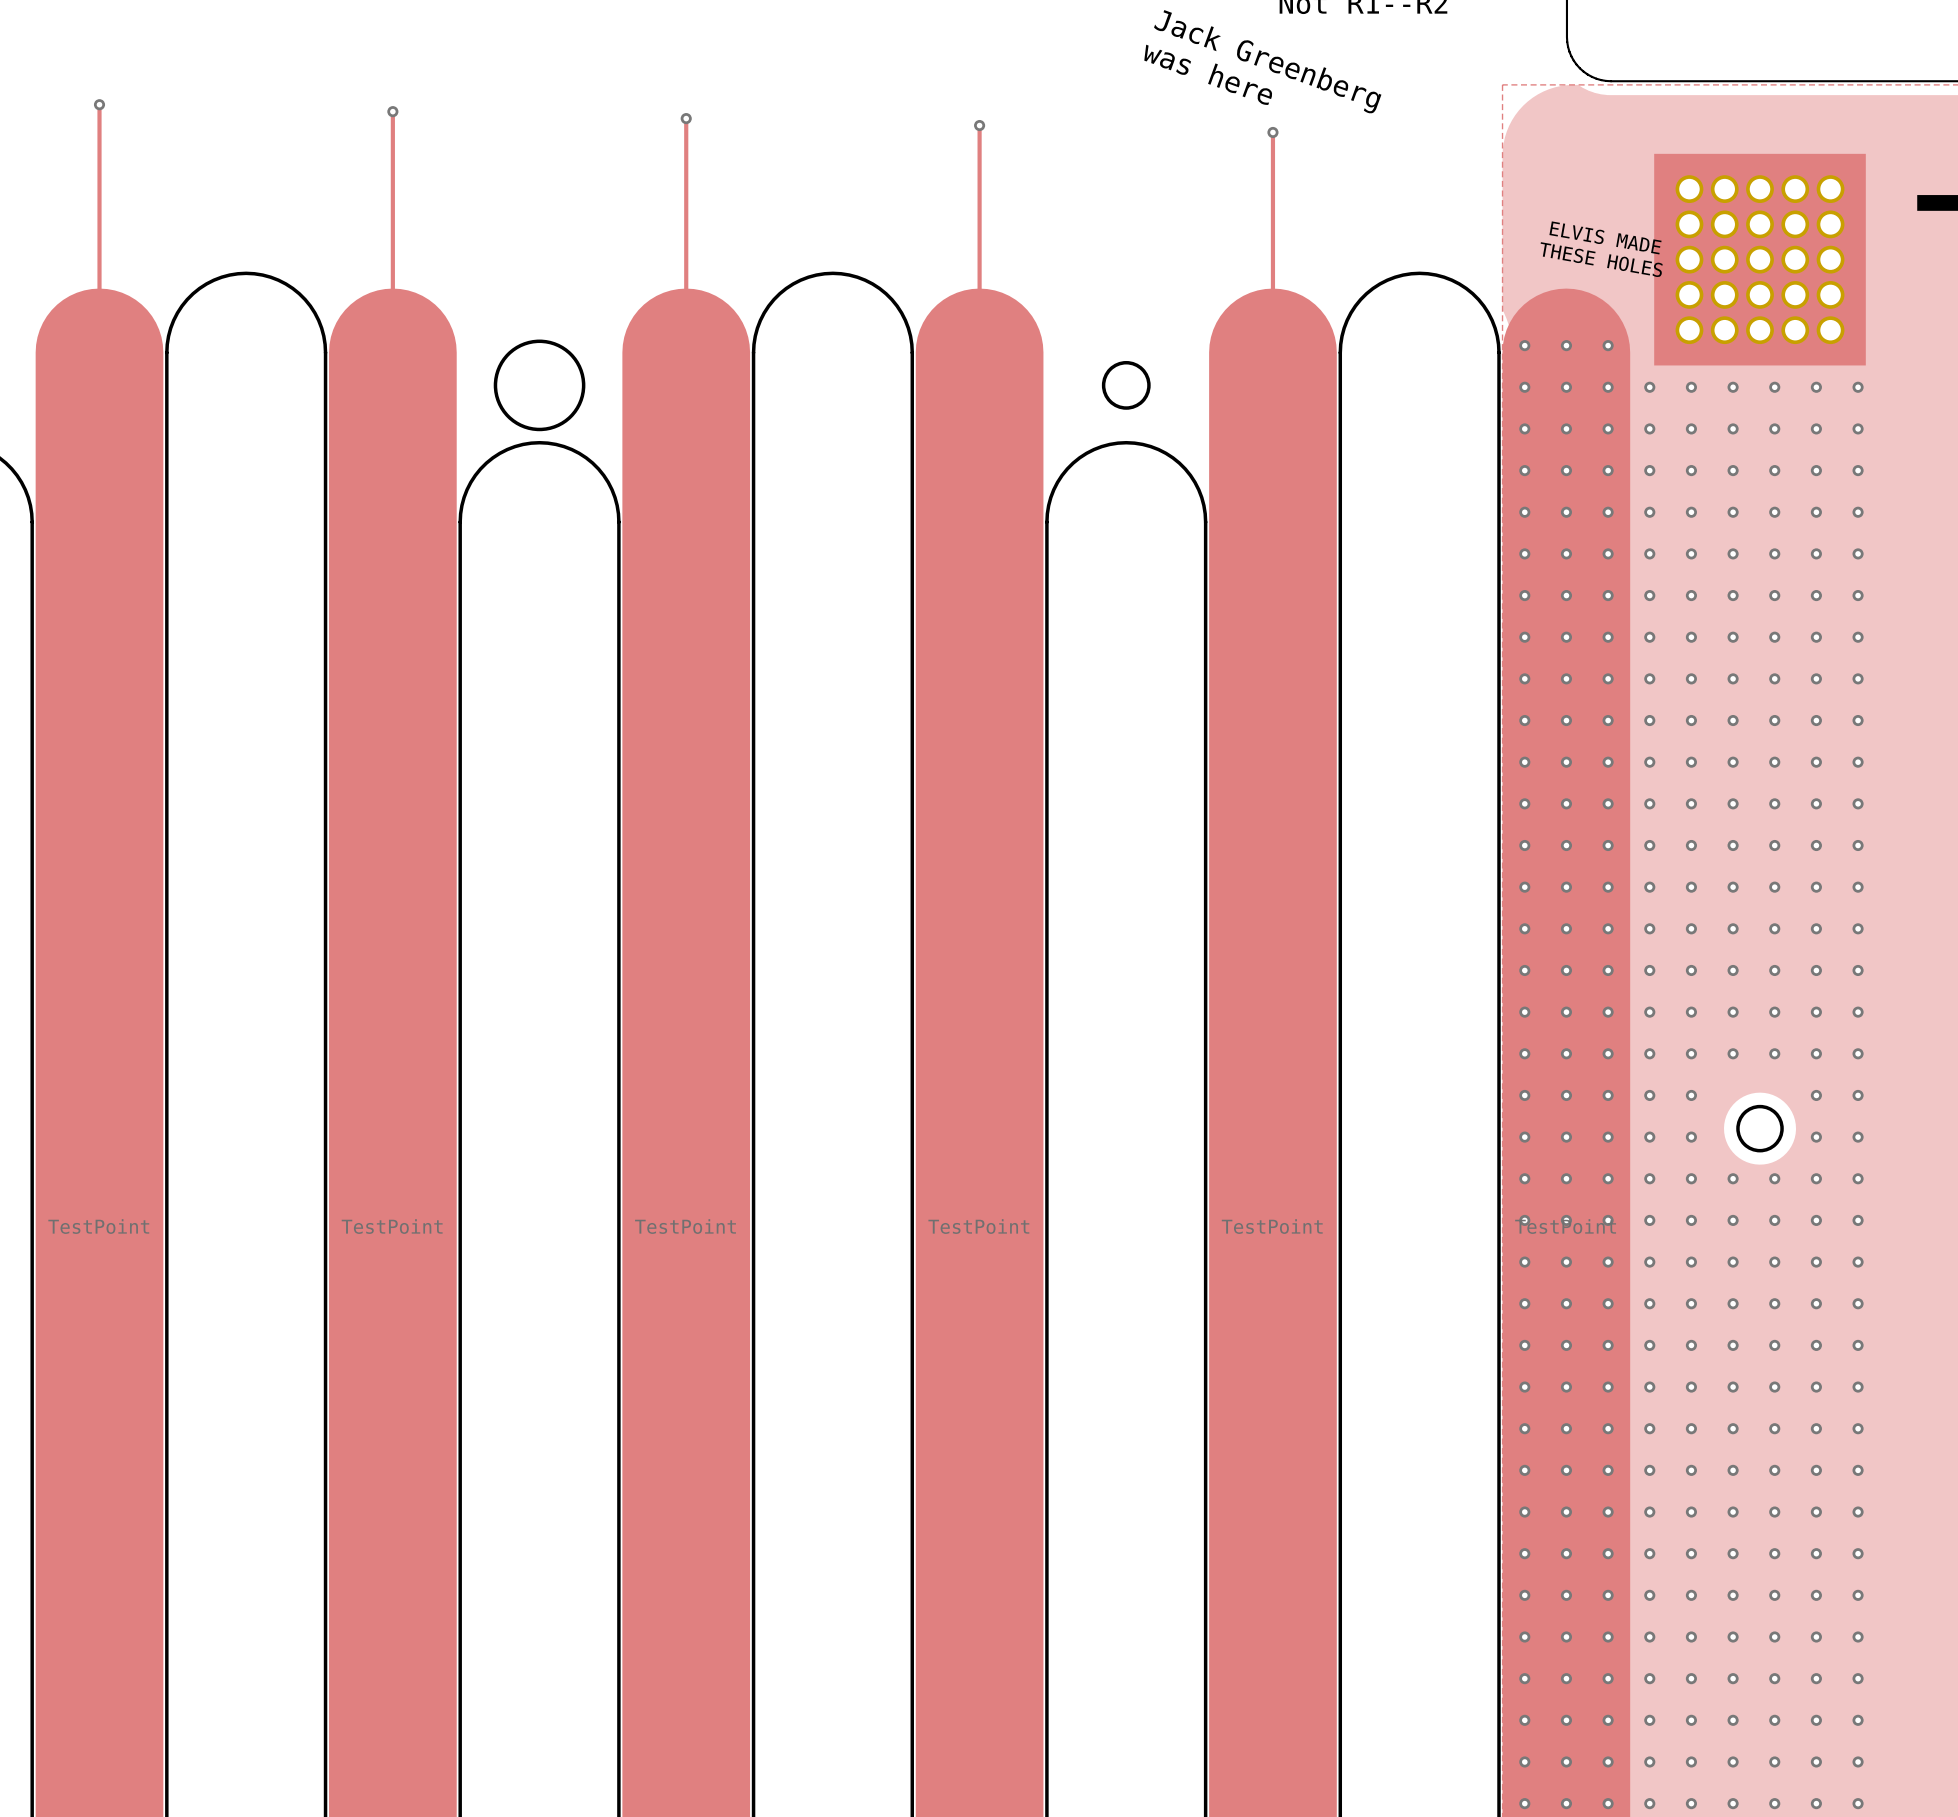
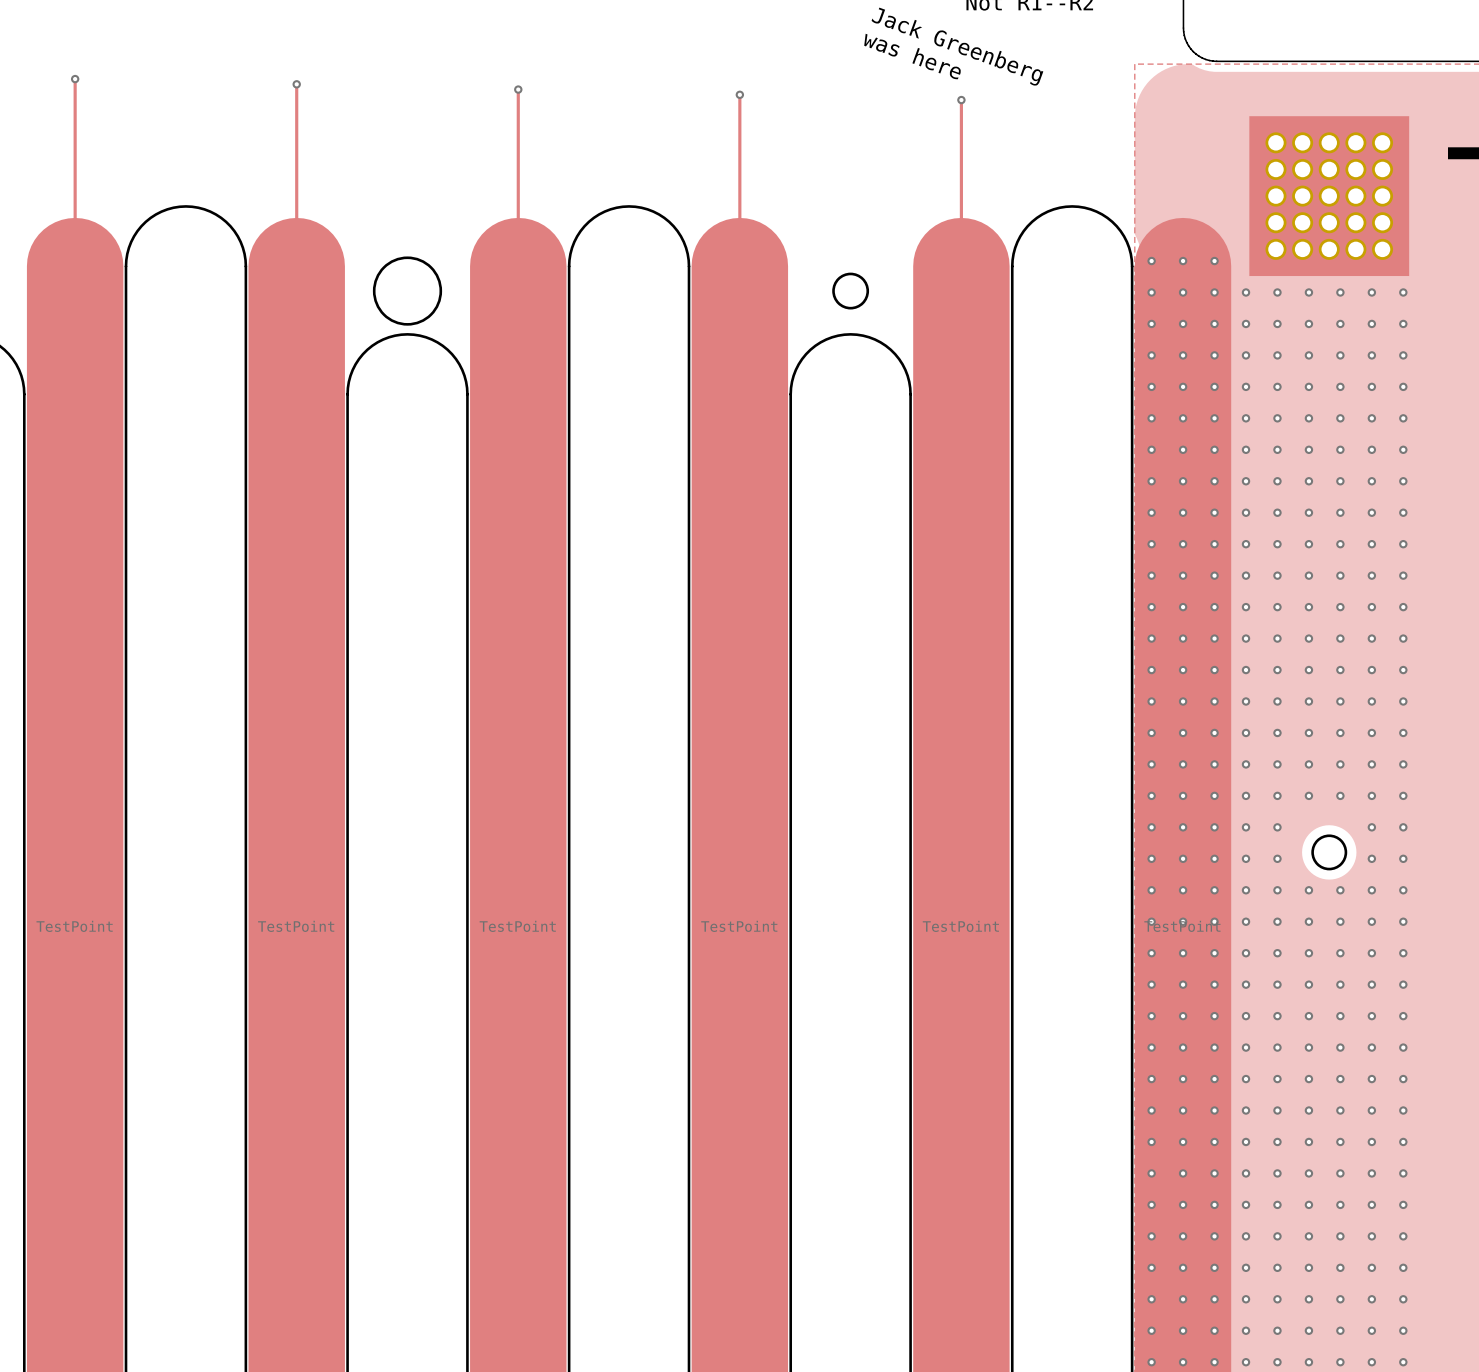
text: ELVIS MADE (1605, 237) -> none
text: THESE HOLES (1601, 259) -> none

